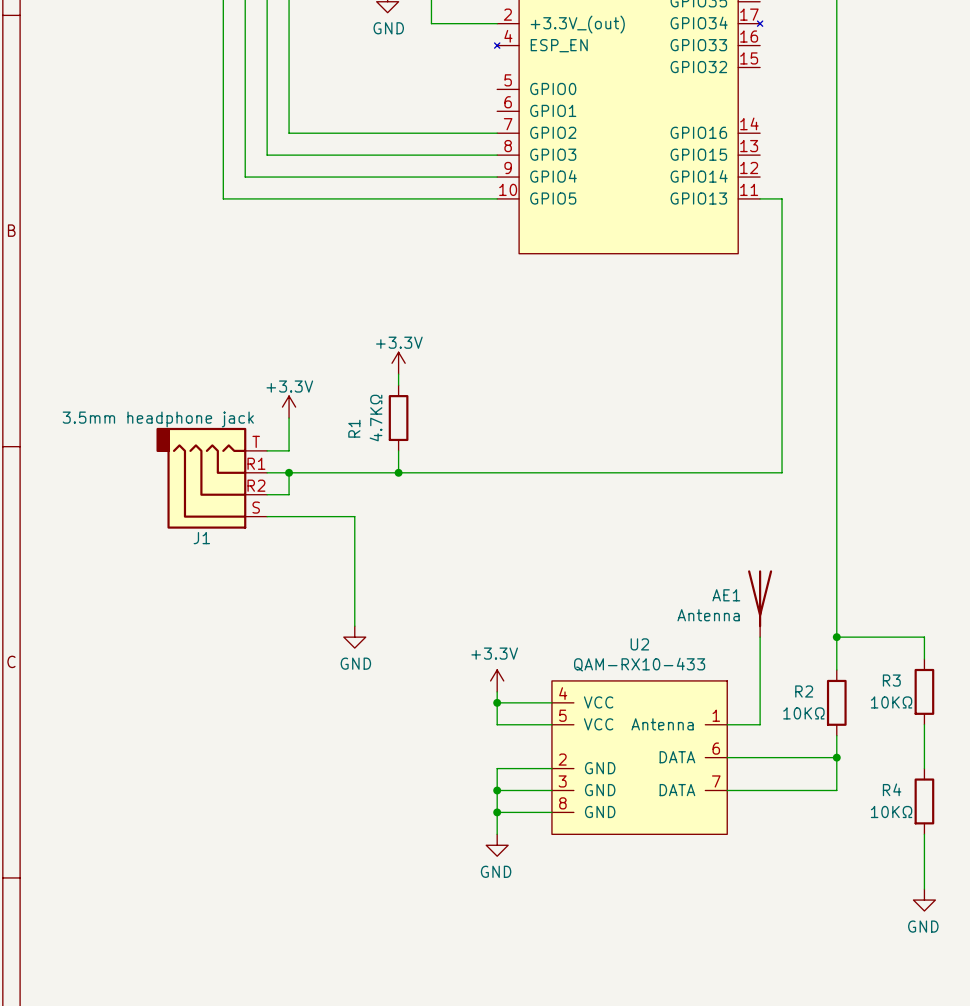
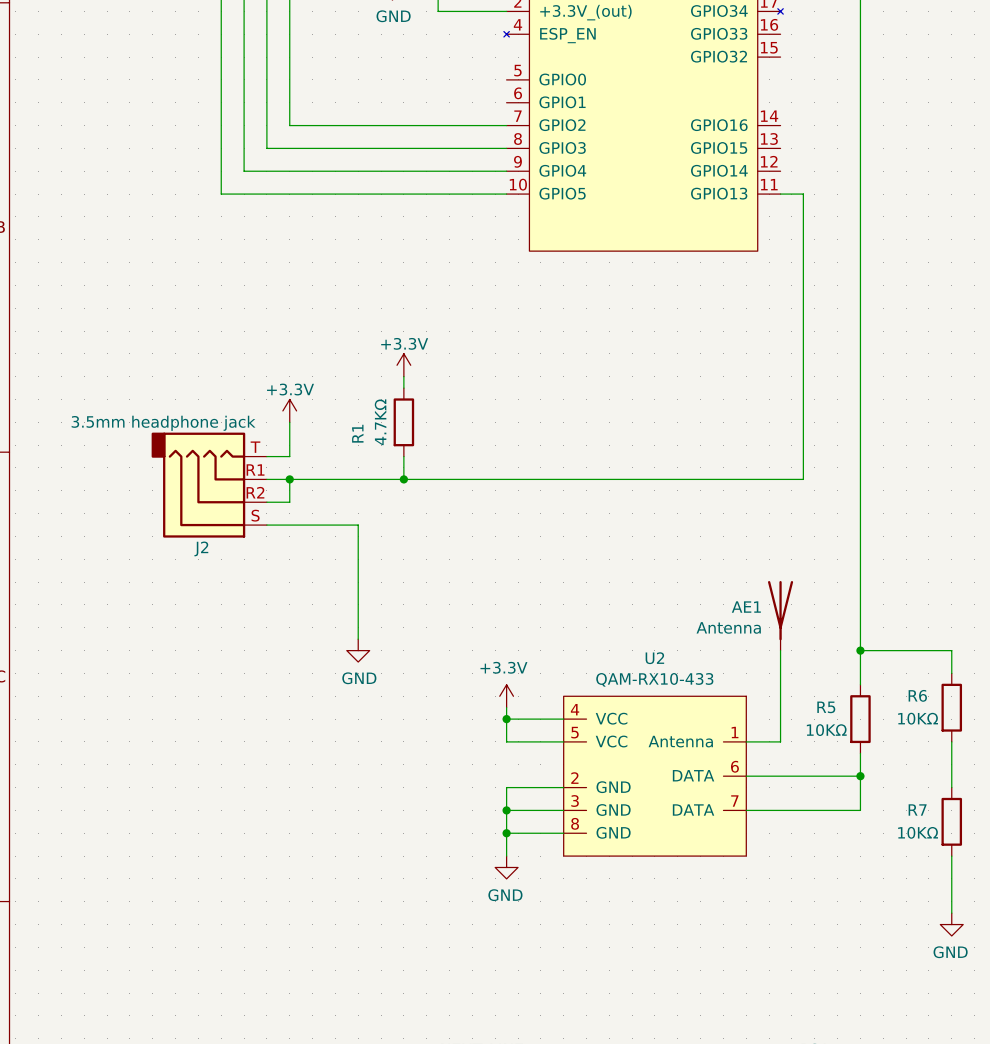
J1 name: J1 (201, 538) -> J2 (201, 548)
R3 name: R3 (891, 680) -> R6 (917, 695)
R2 name: R2 (804, 691) -> R5 (826, 707)
R4 name: R4 (892, 789) -> R7 (917, 809)

